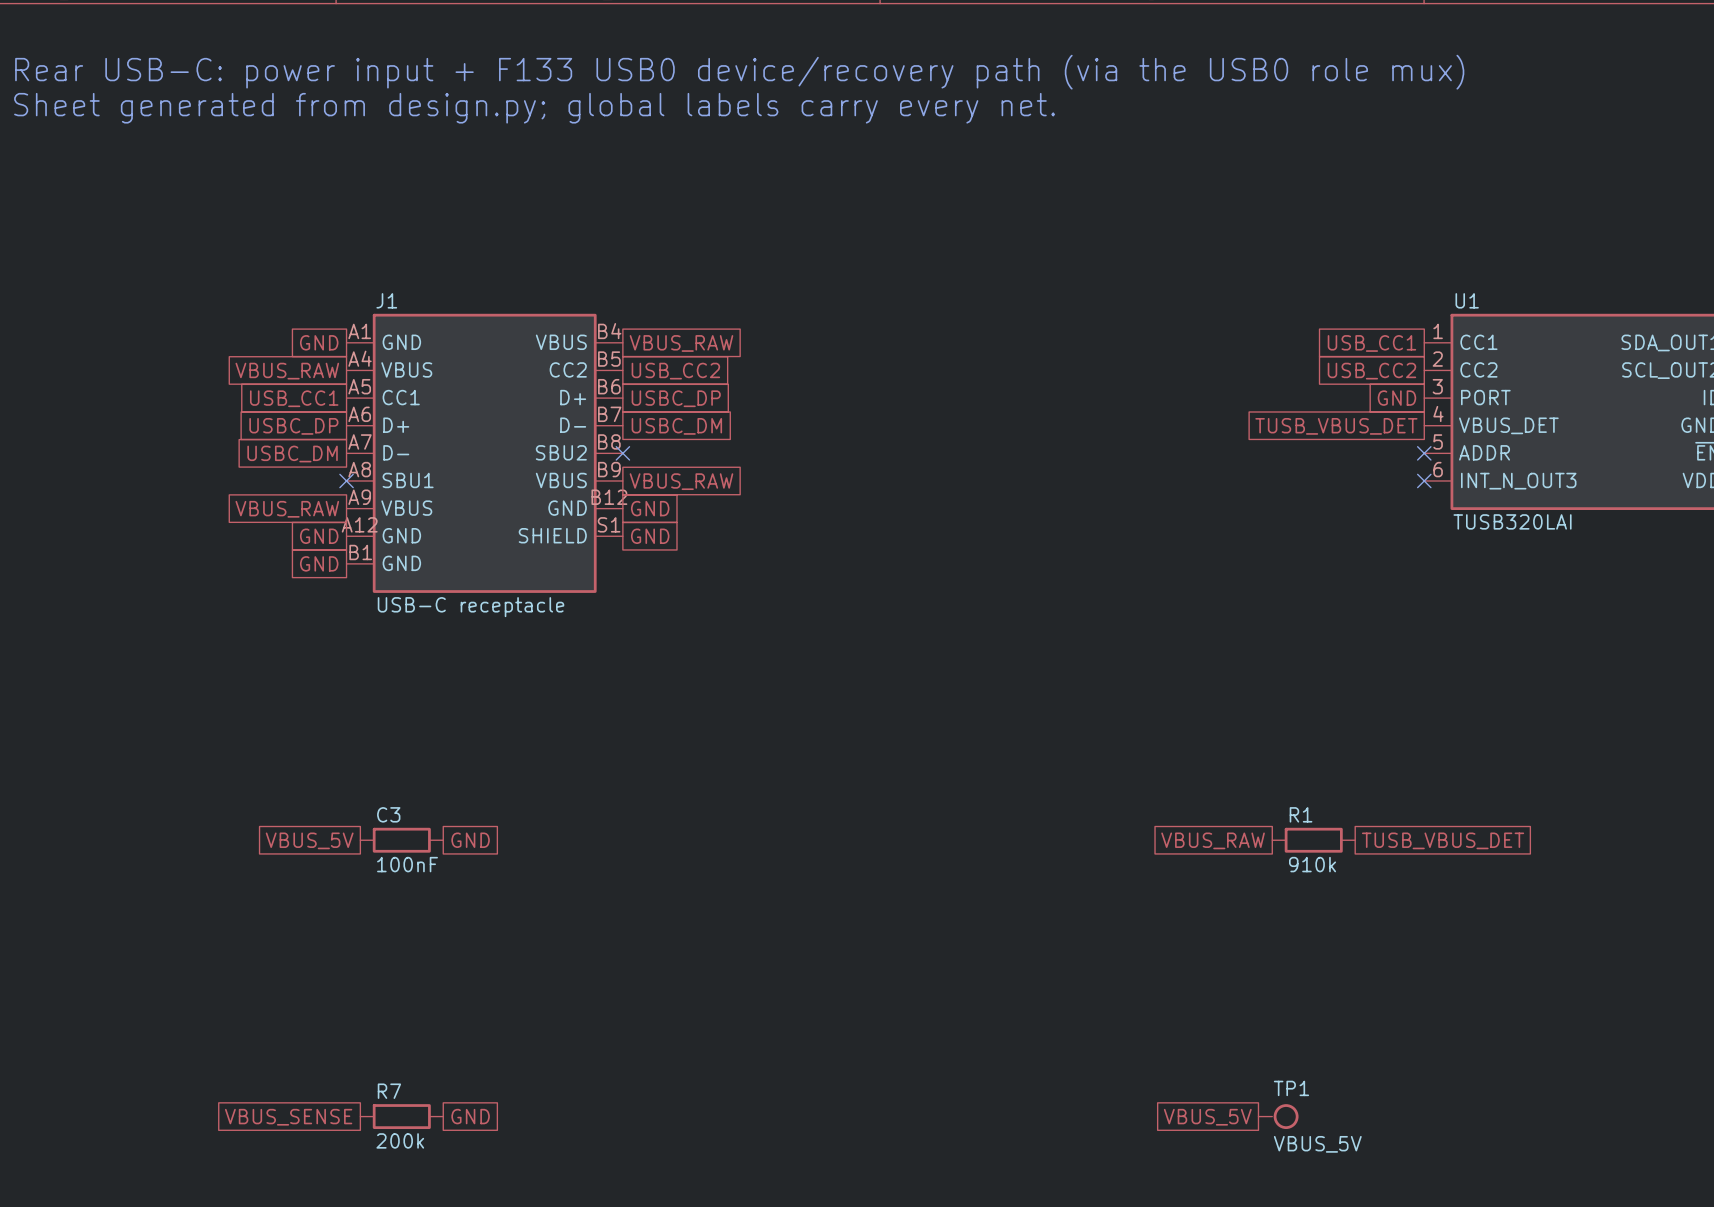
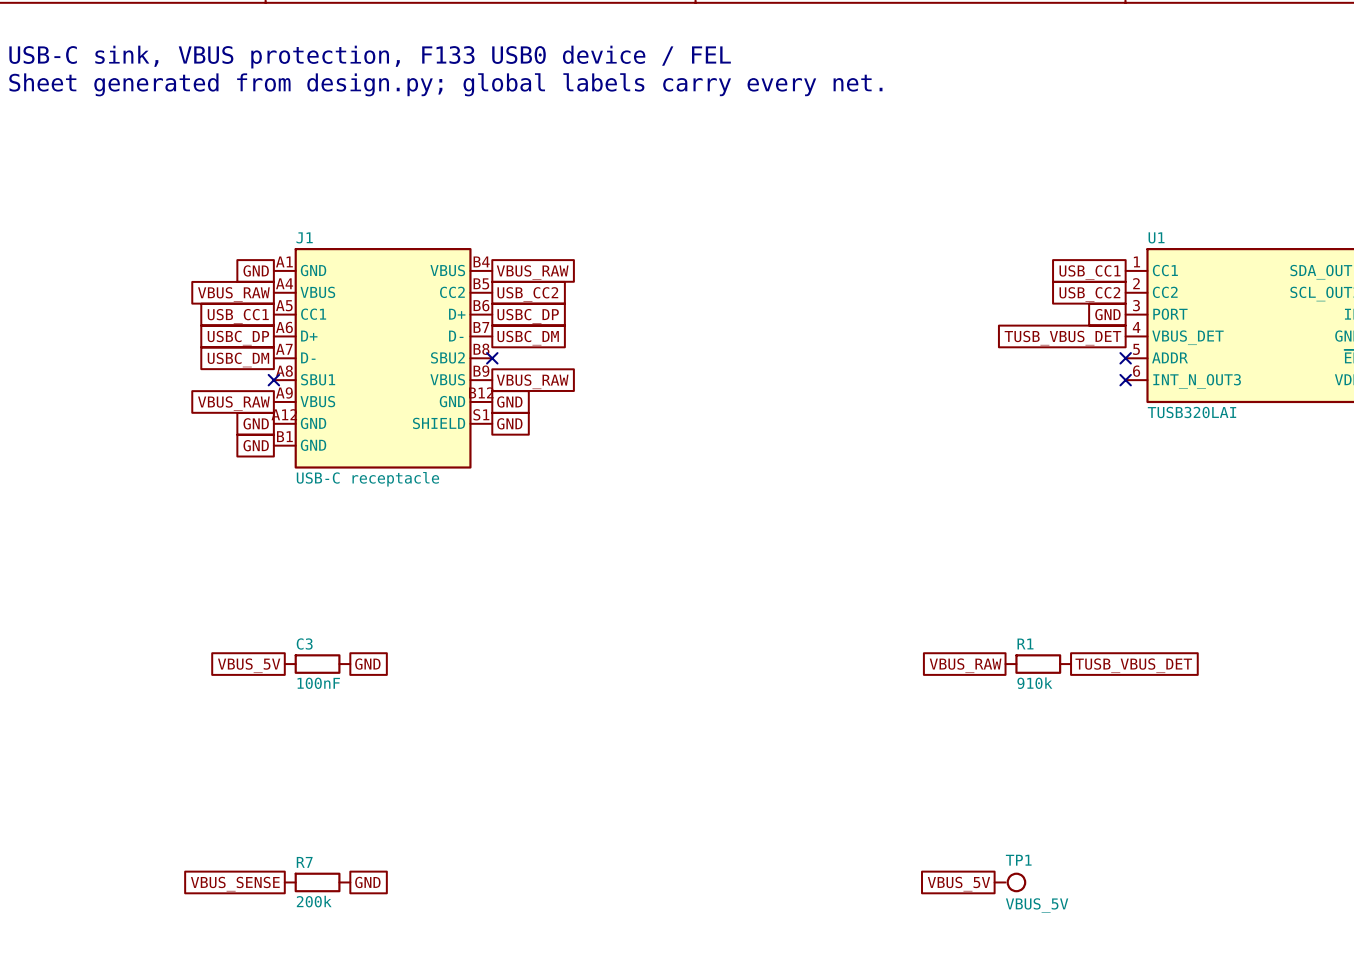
text: Rear USB-C: power input + F133 USB0 device/recovery path (via the USB0 role mux) (739, 72) -> USB-C sink, VBUS protection, F133 USB0 device / FEL (370, 57)

